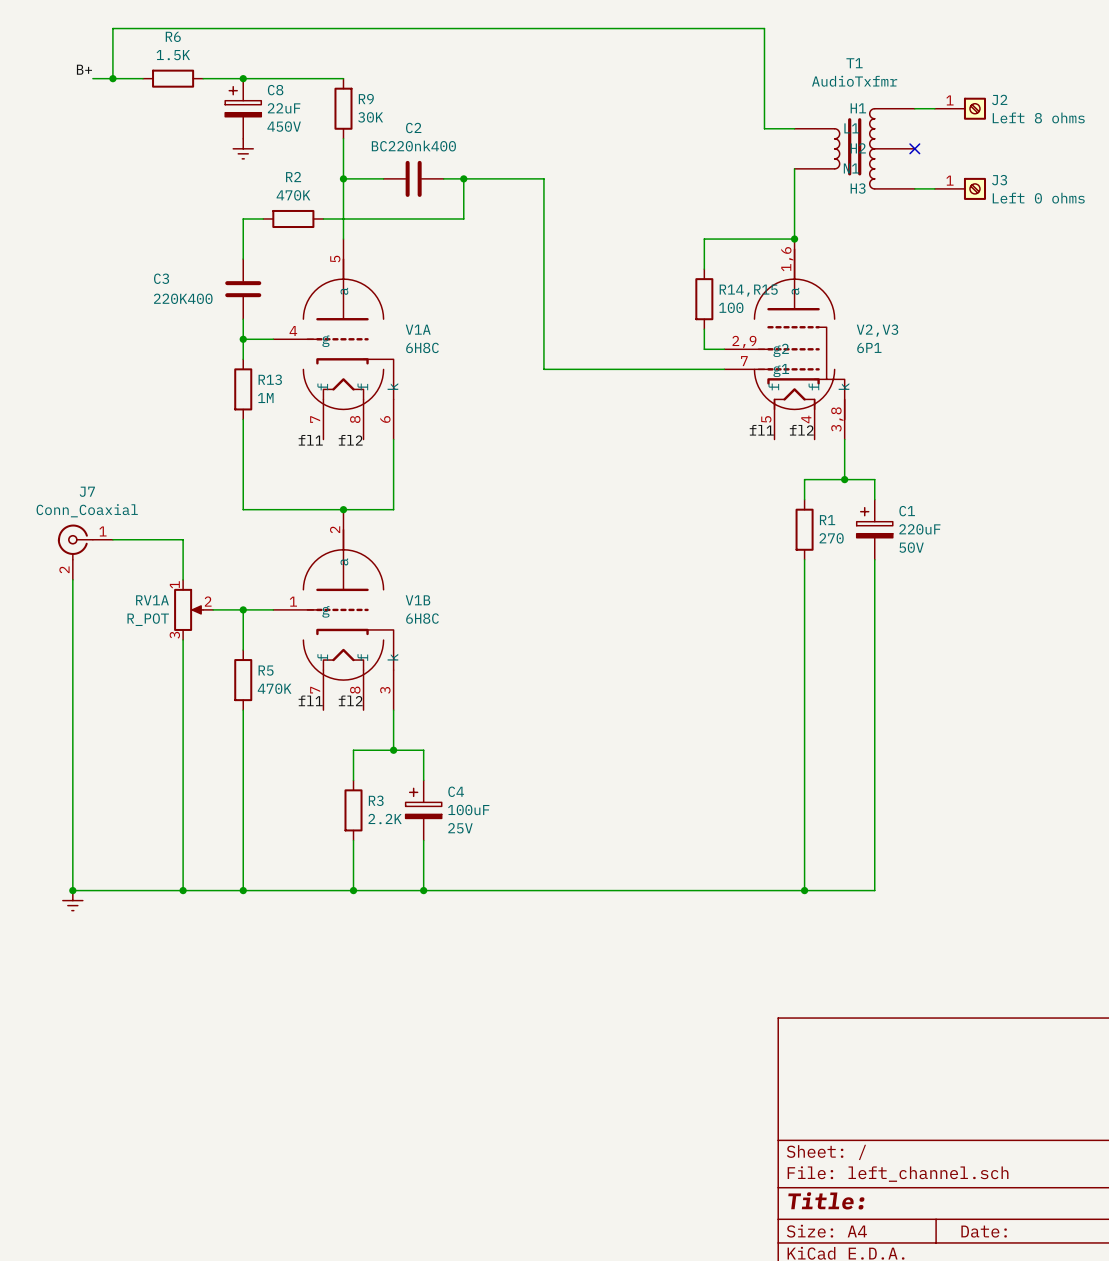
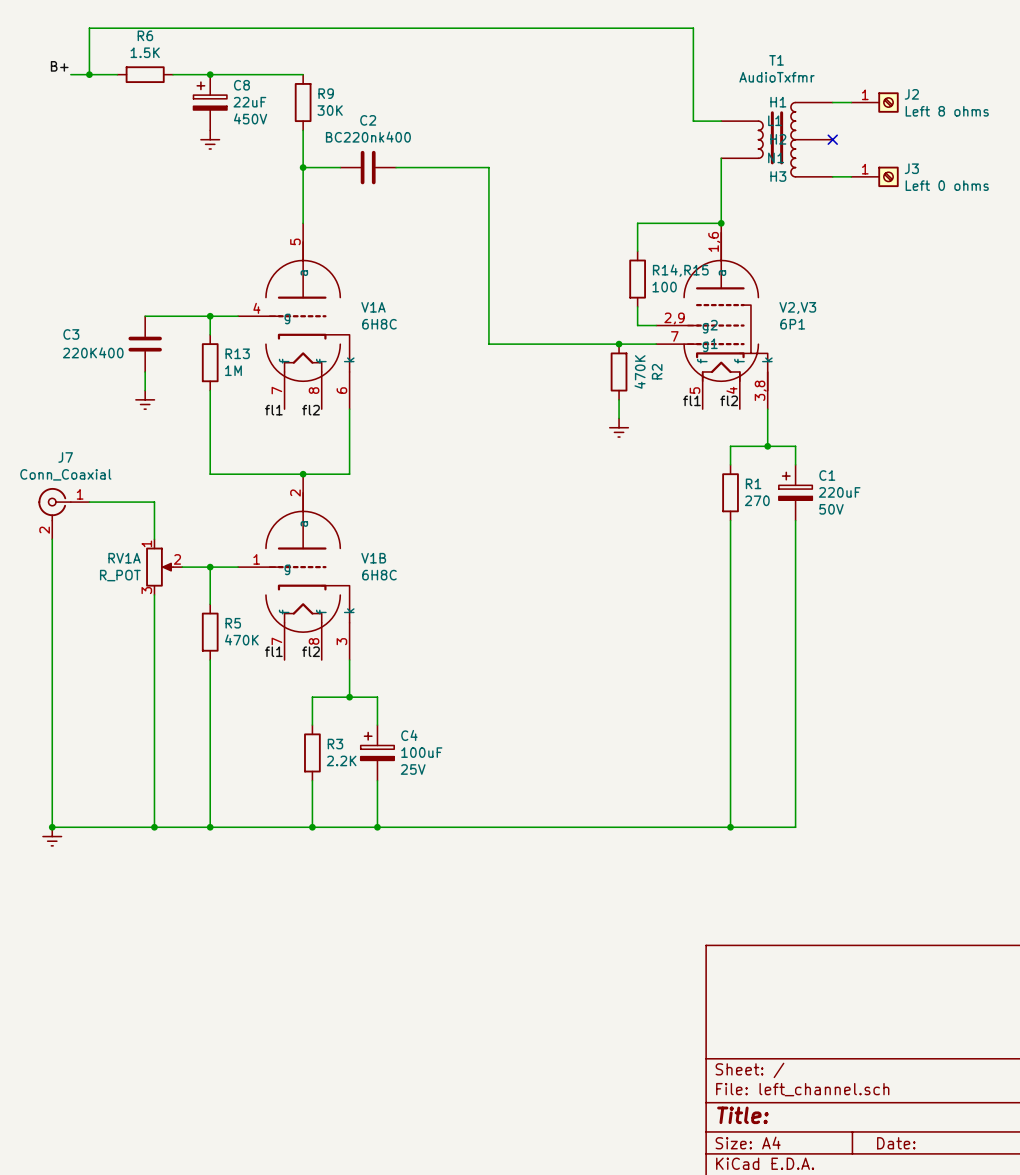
wire: (463, 178) (463, 218) (323, 218) -> none
junction: (463, 178) -> none
wire: (263, 218) (243, 218) (243, 259) -> none
R2 rotation: 0° (293, 218) -> 90° clockwise (619, 371)
R2 position: (293, 218) -> (619, 371)
C3 position: (243, 289) -> (145, 344)
wire: (243, 319) (243, 339) -> (145, 316) (210, 316)
junction: none -> (619, 344)
wire: none -> (145, 371) (145, 390)
power symbol: none -> (145, 399)
wire: none -> (619, 399) (619, 418)
power symbol: none -> (619, 427)

